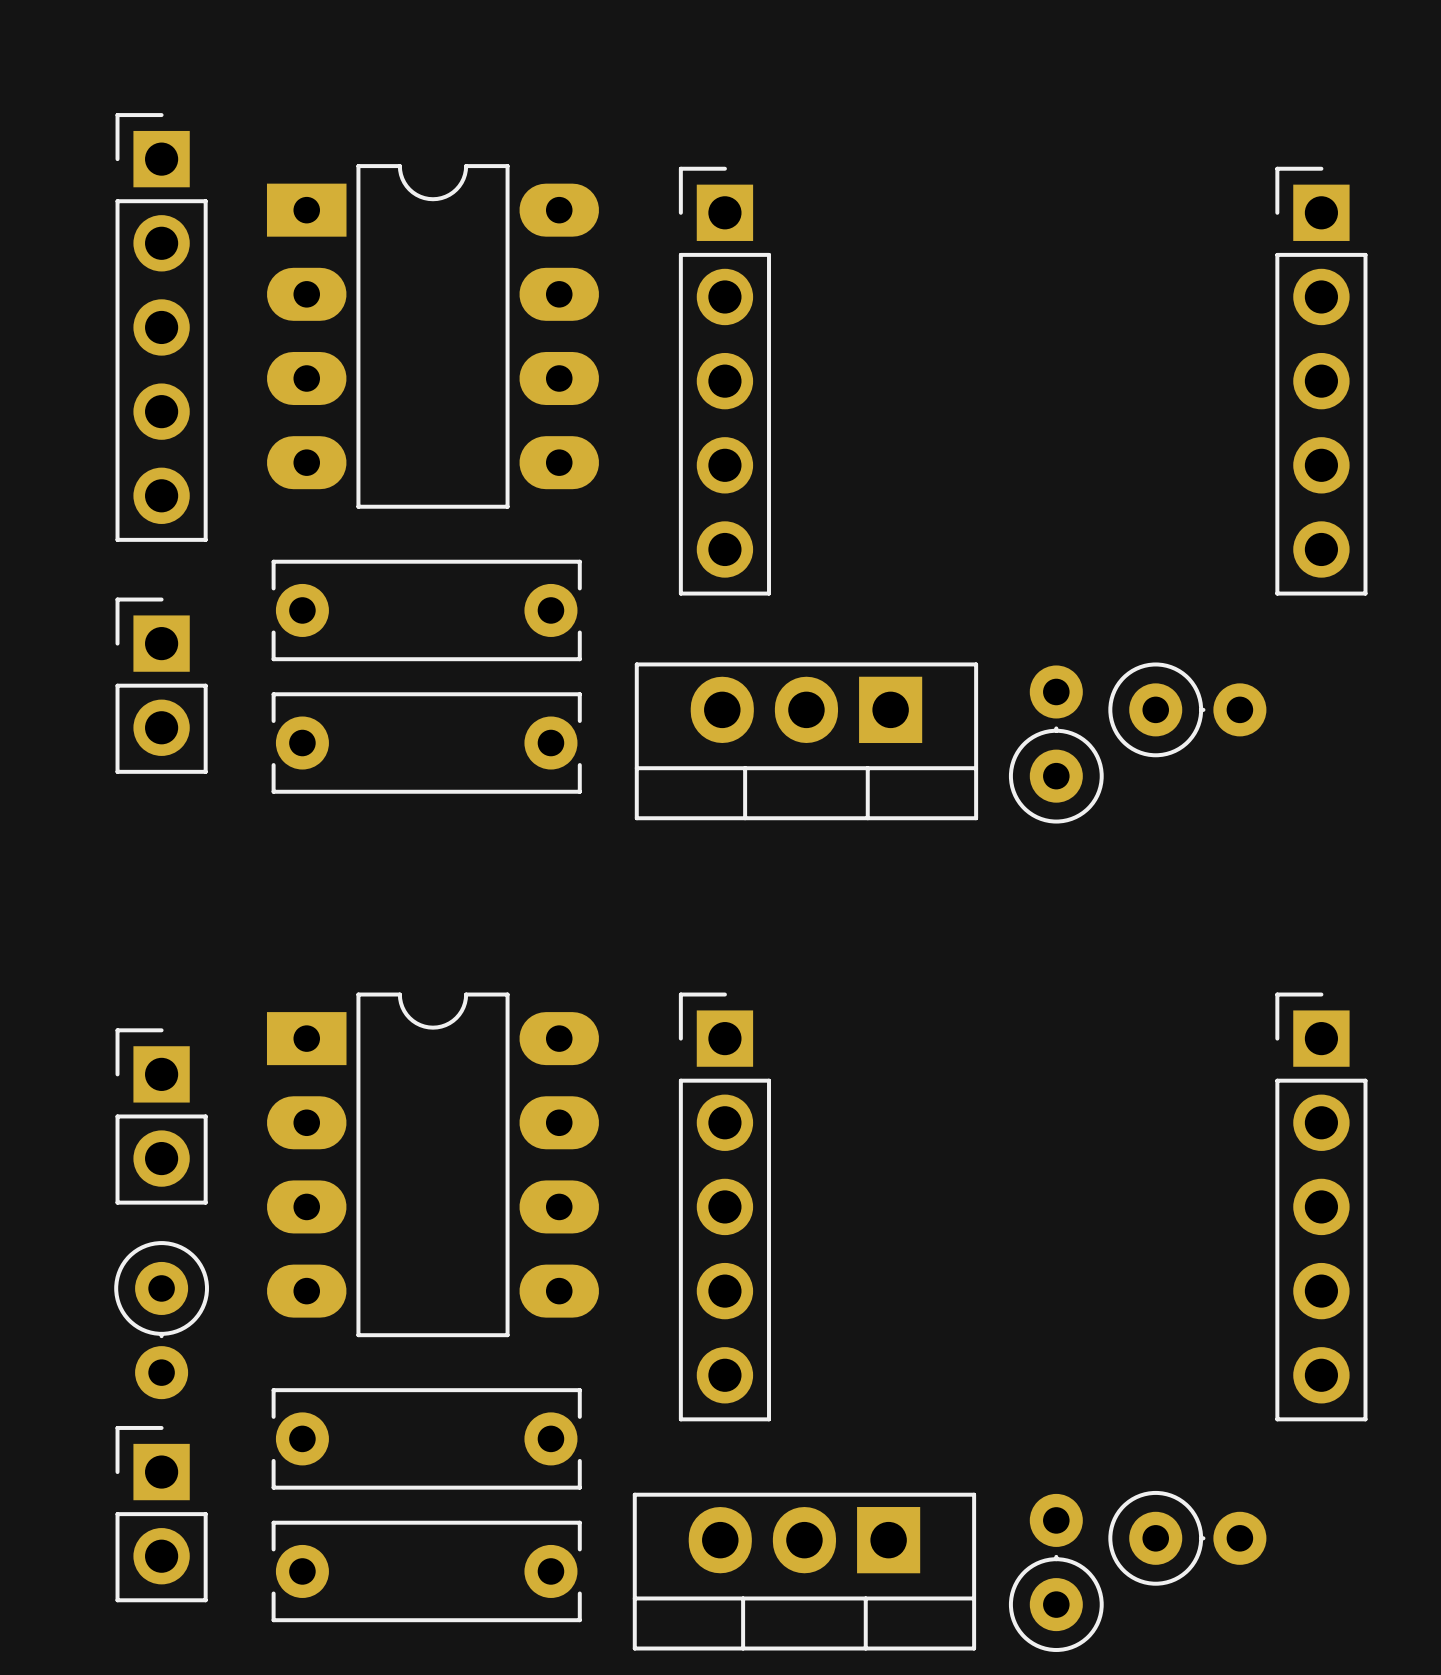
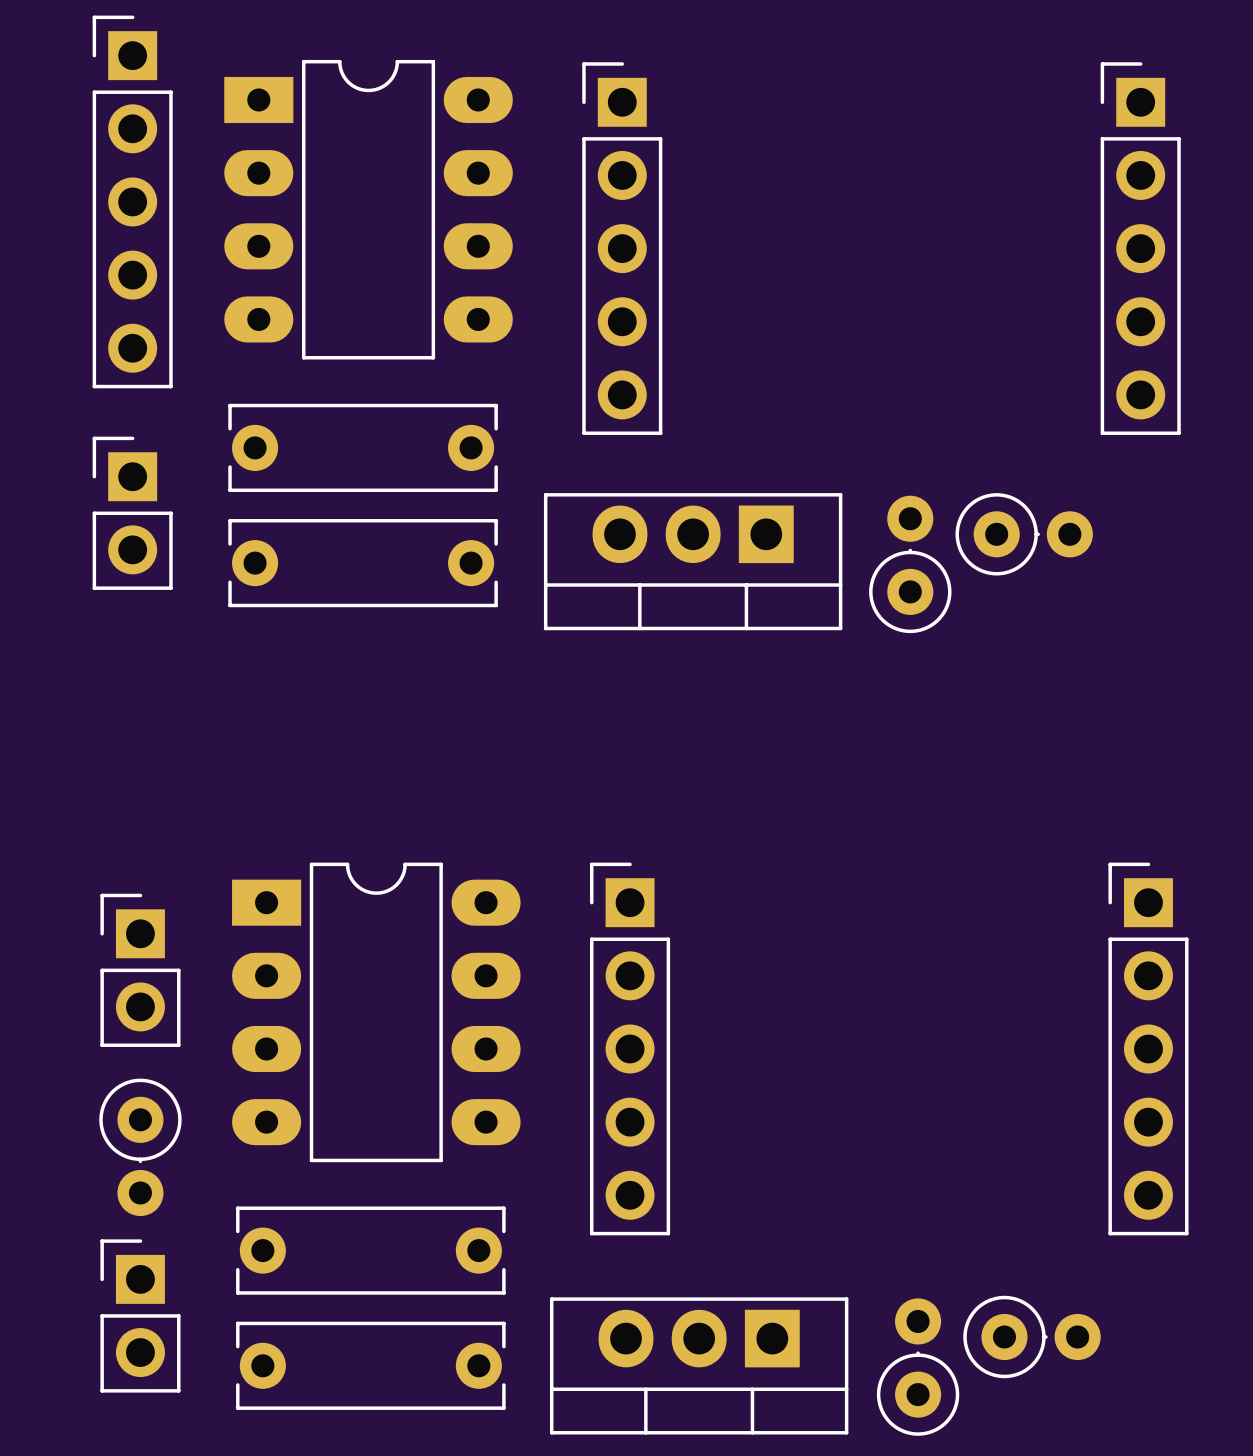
part position: (161, 327) -> (132, 201)
part position: (432, 336) -> (368, 209)
part position: (724, 381) -> (622, 248)
part position: (1321, 381) -> (1140, 248)
part: none -> (363, 447)
part position: (426, 610) -> (363, 563)
part: none -> (1024, 534)
part: none -> (910, 564)
part position: (161, 685) -> (132, 513)
part: (1187, 709) -> none
part position: (806, 741) -> (693, 561)
part: (426, 743) -> none
part: (1056, 744) -> none

